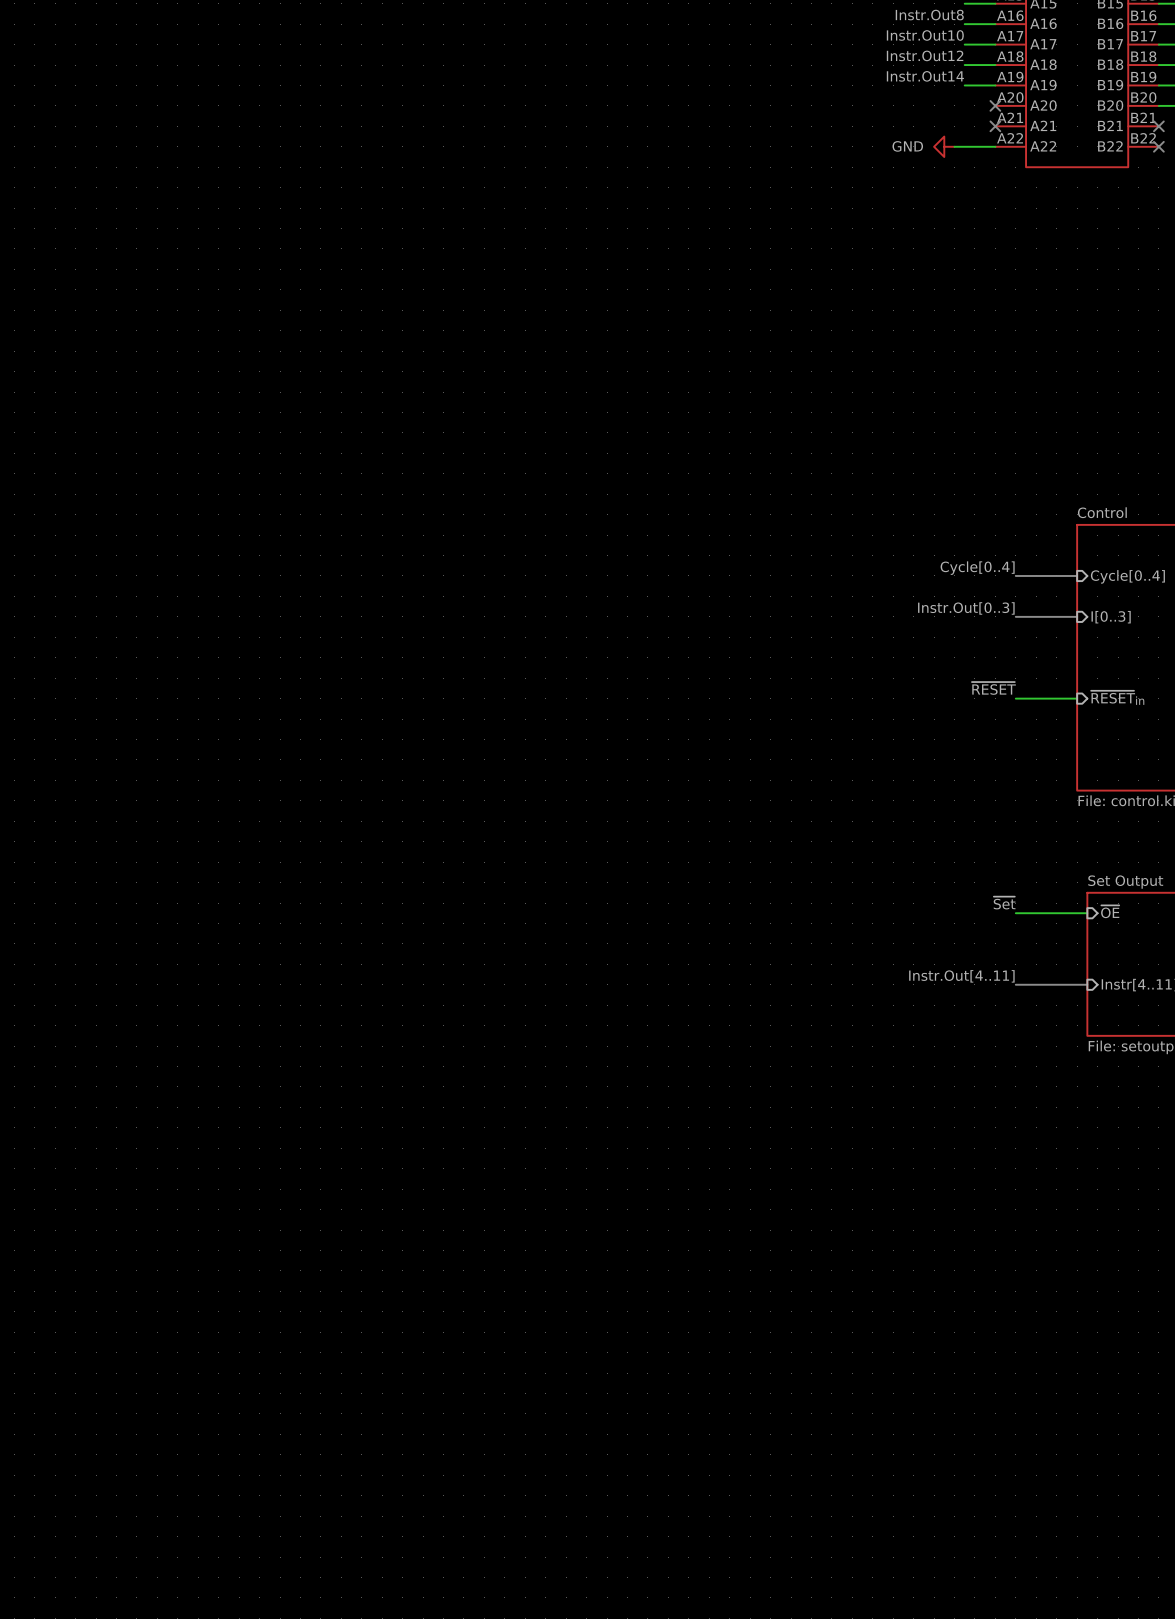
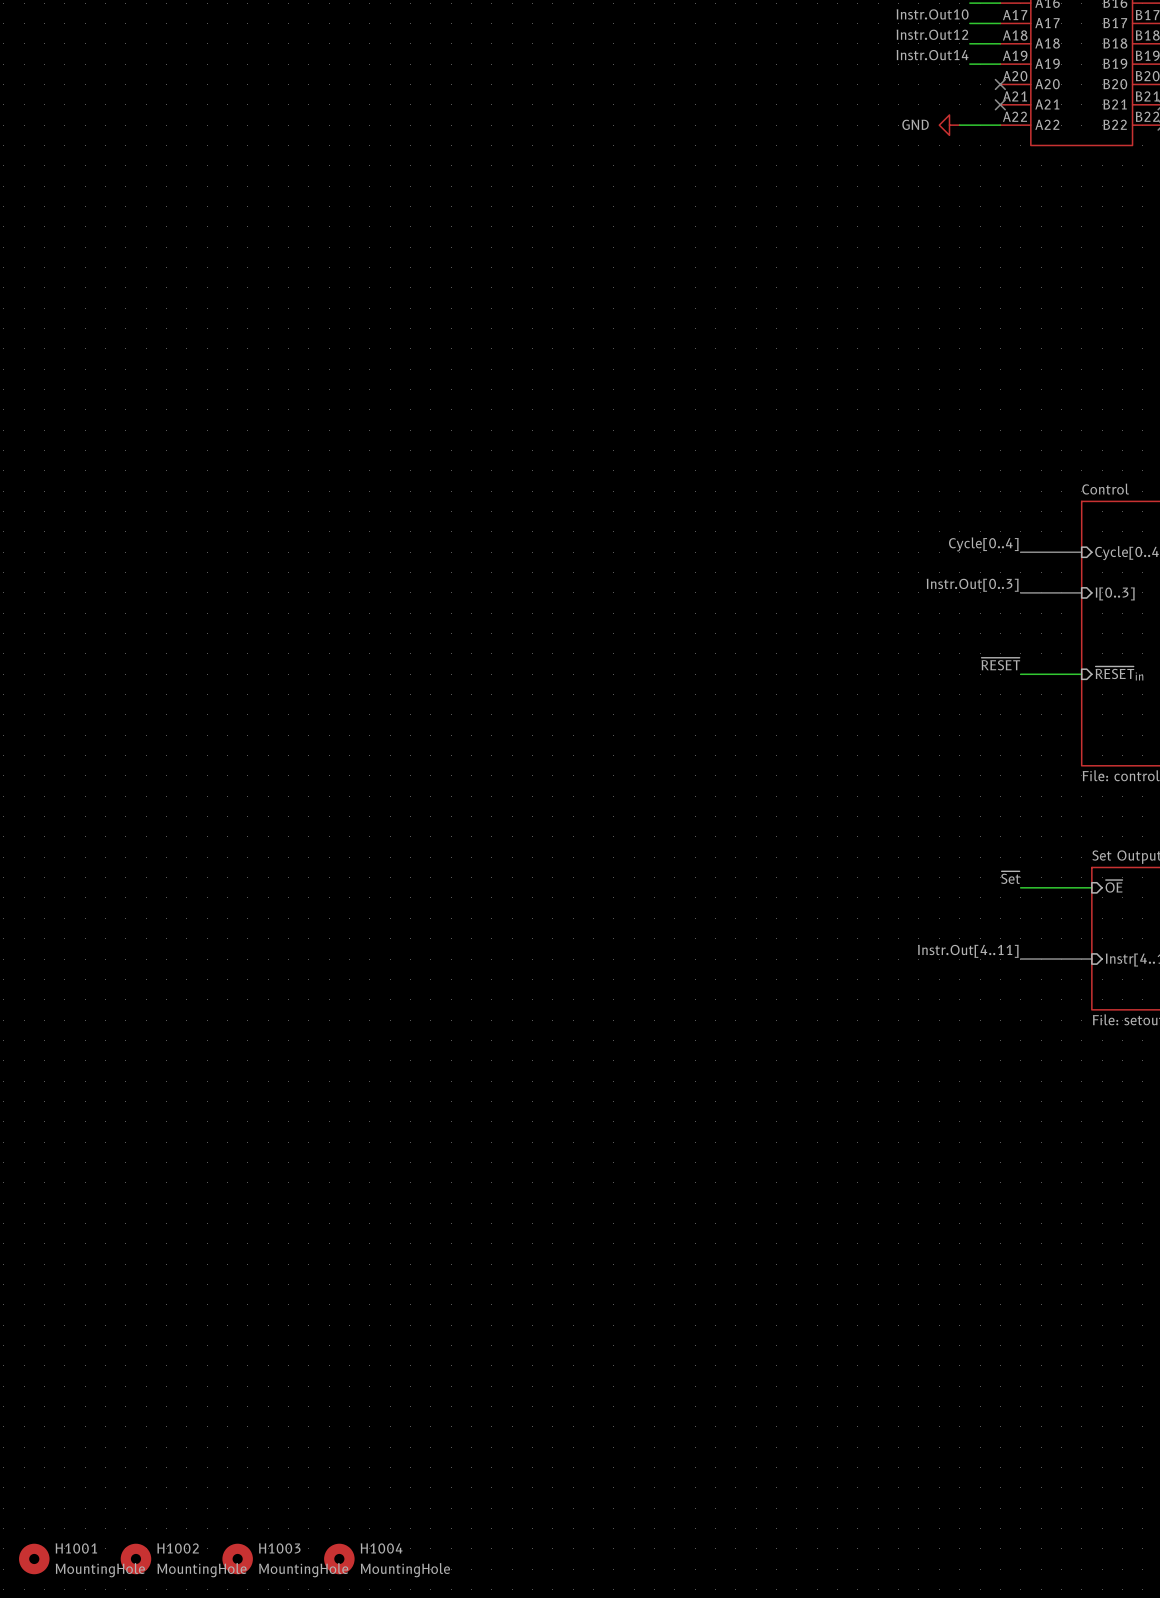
H1001: none -> MountingHole (34, 1558)
H1002: none -> MountingHole (135, 1558)
H1003: none -> MountingHole (237, 1558)
H1004: none -> MountingHole (339, 1558)

